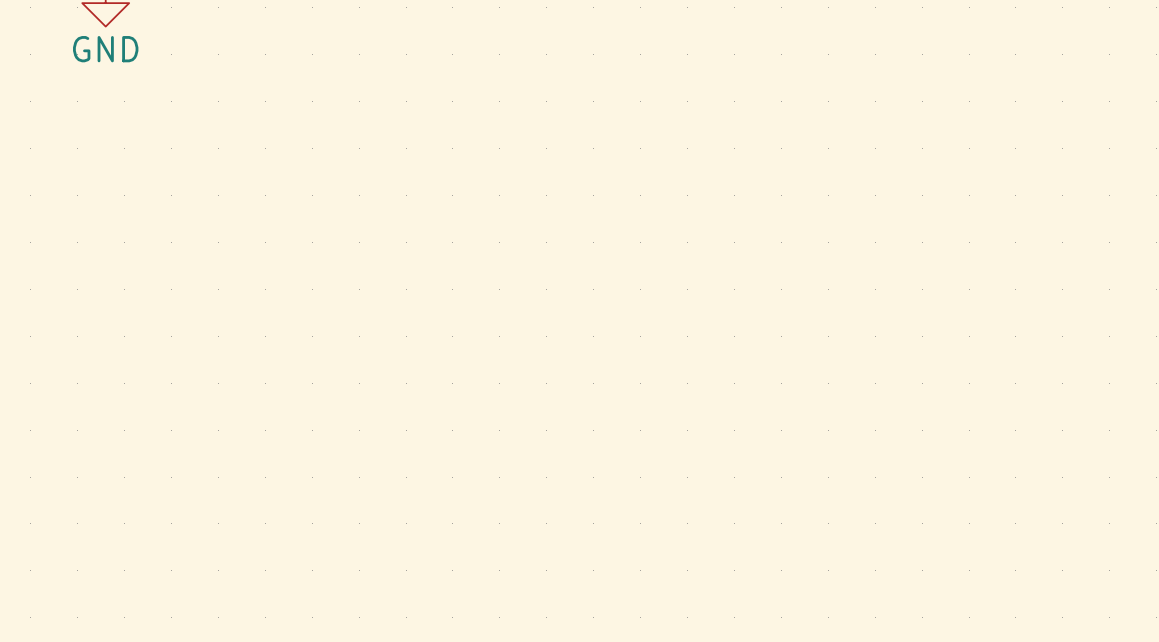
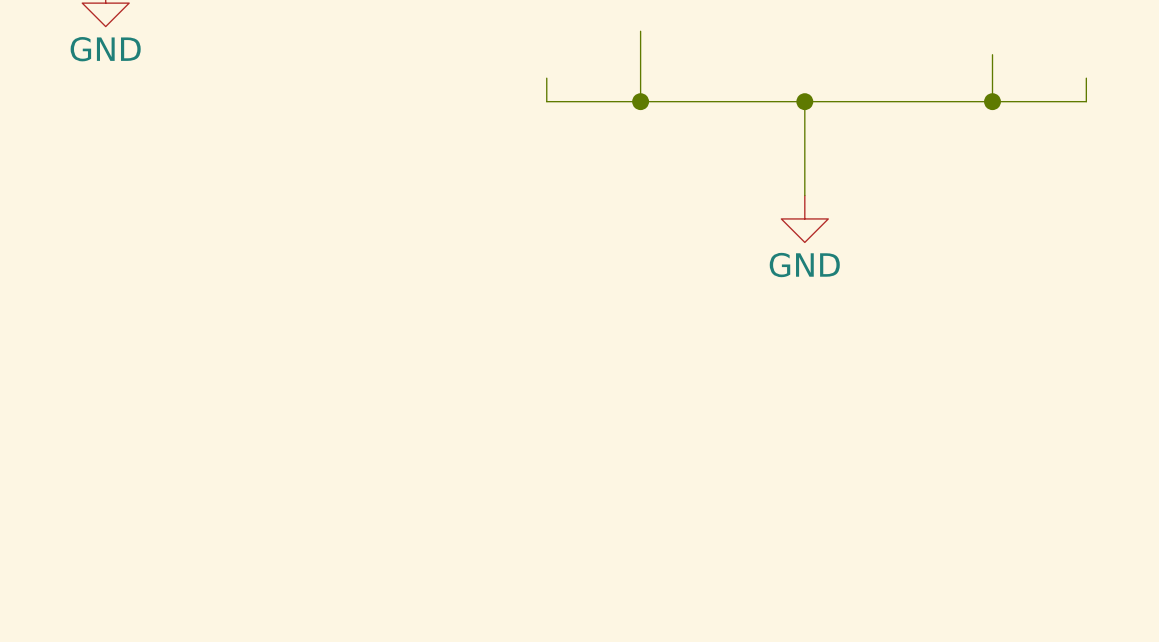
wire: none -> (640, 31) (640, 101)
wire: none -> (992, 54) (992, 101)
wire: none -> (546, 78) (546, 101) (1086, 101) (1086, 78)
junction: none -> (640, 101)
wire: none -> (804, 101) (804, 195)
junction: none -> (804, 101)
junction: none -> (992, 101)
power symbol: none -> GND (804, 218)

